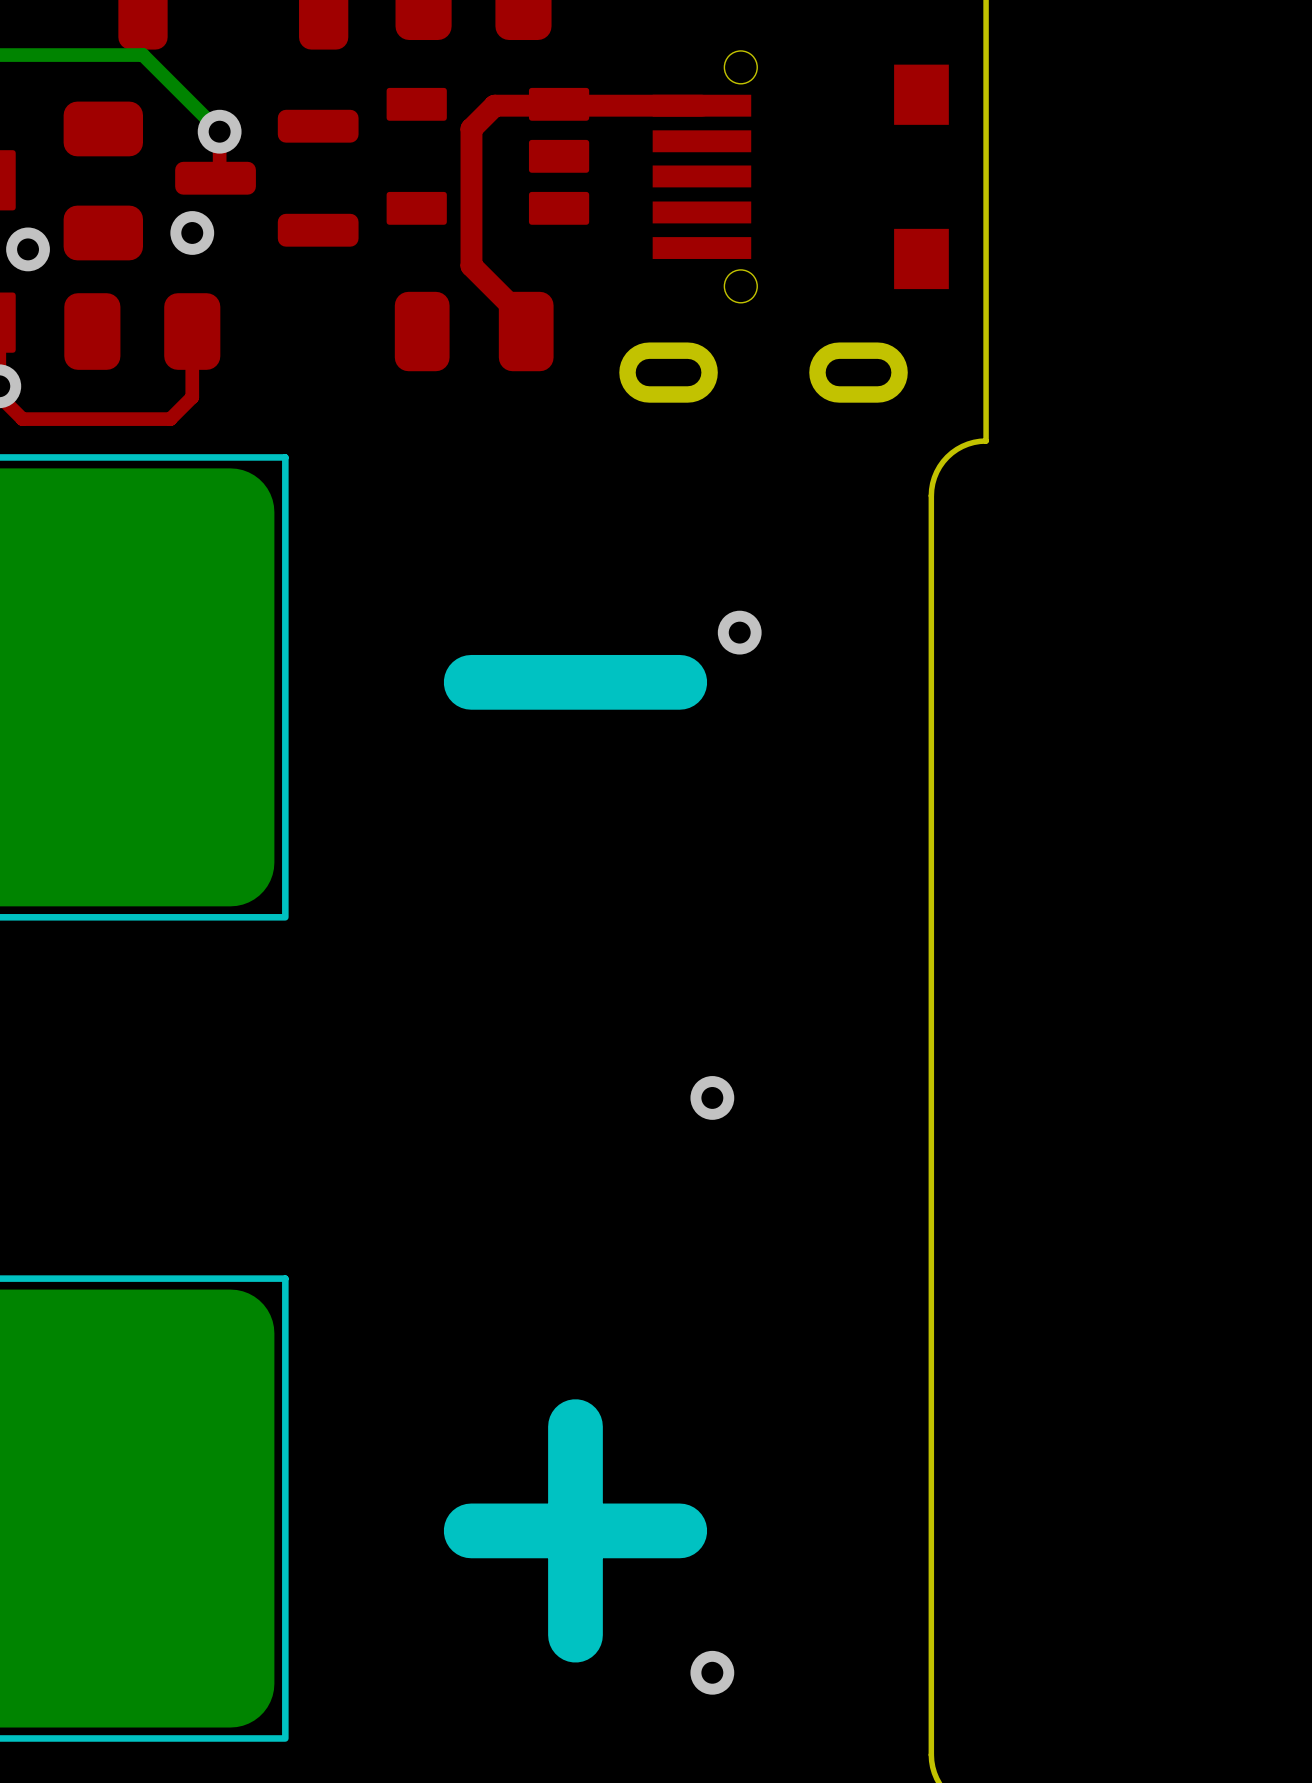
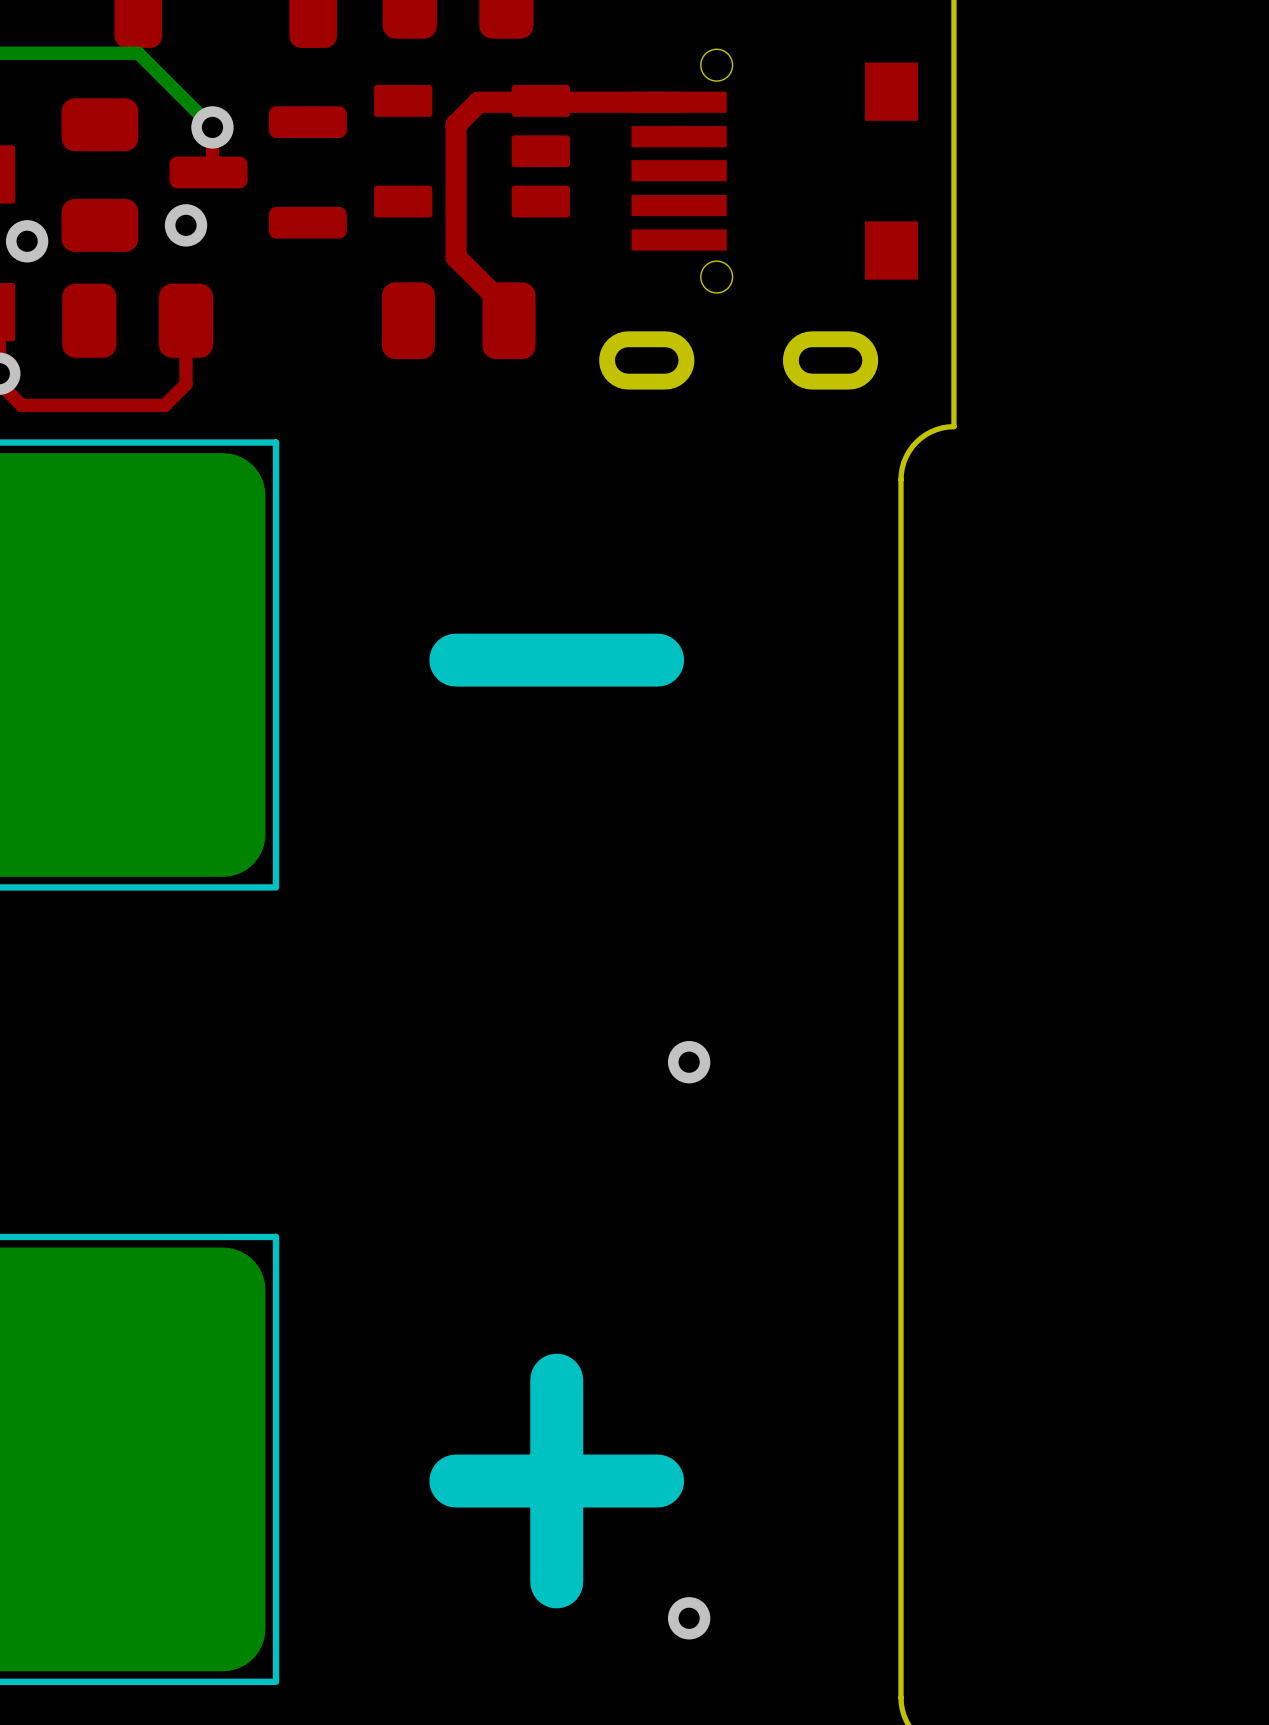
via: (739, 632) -> none

